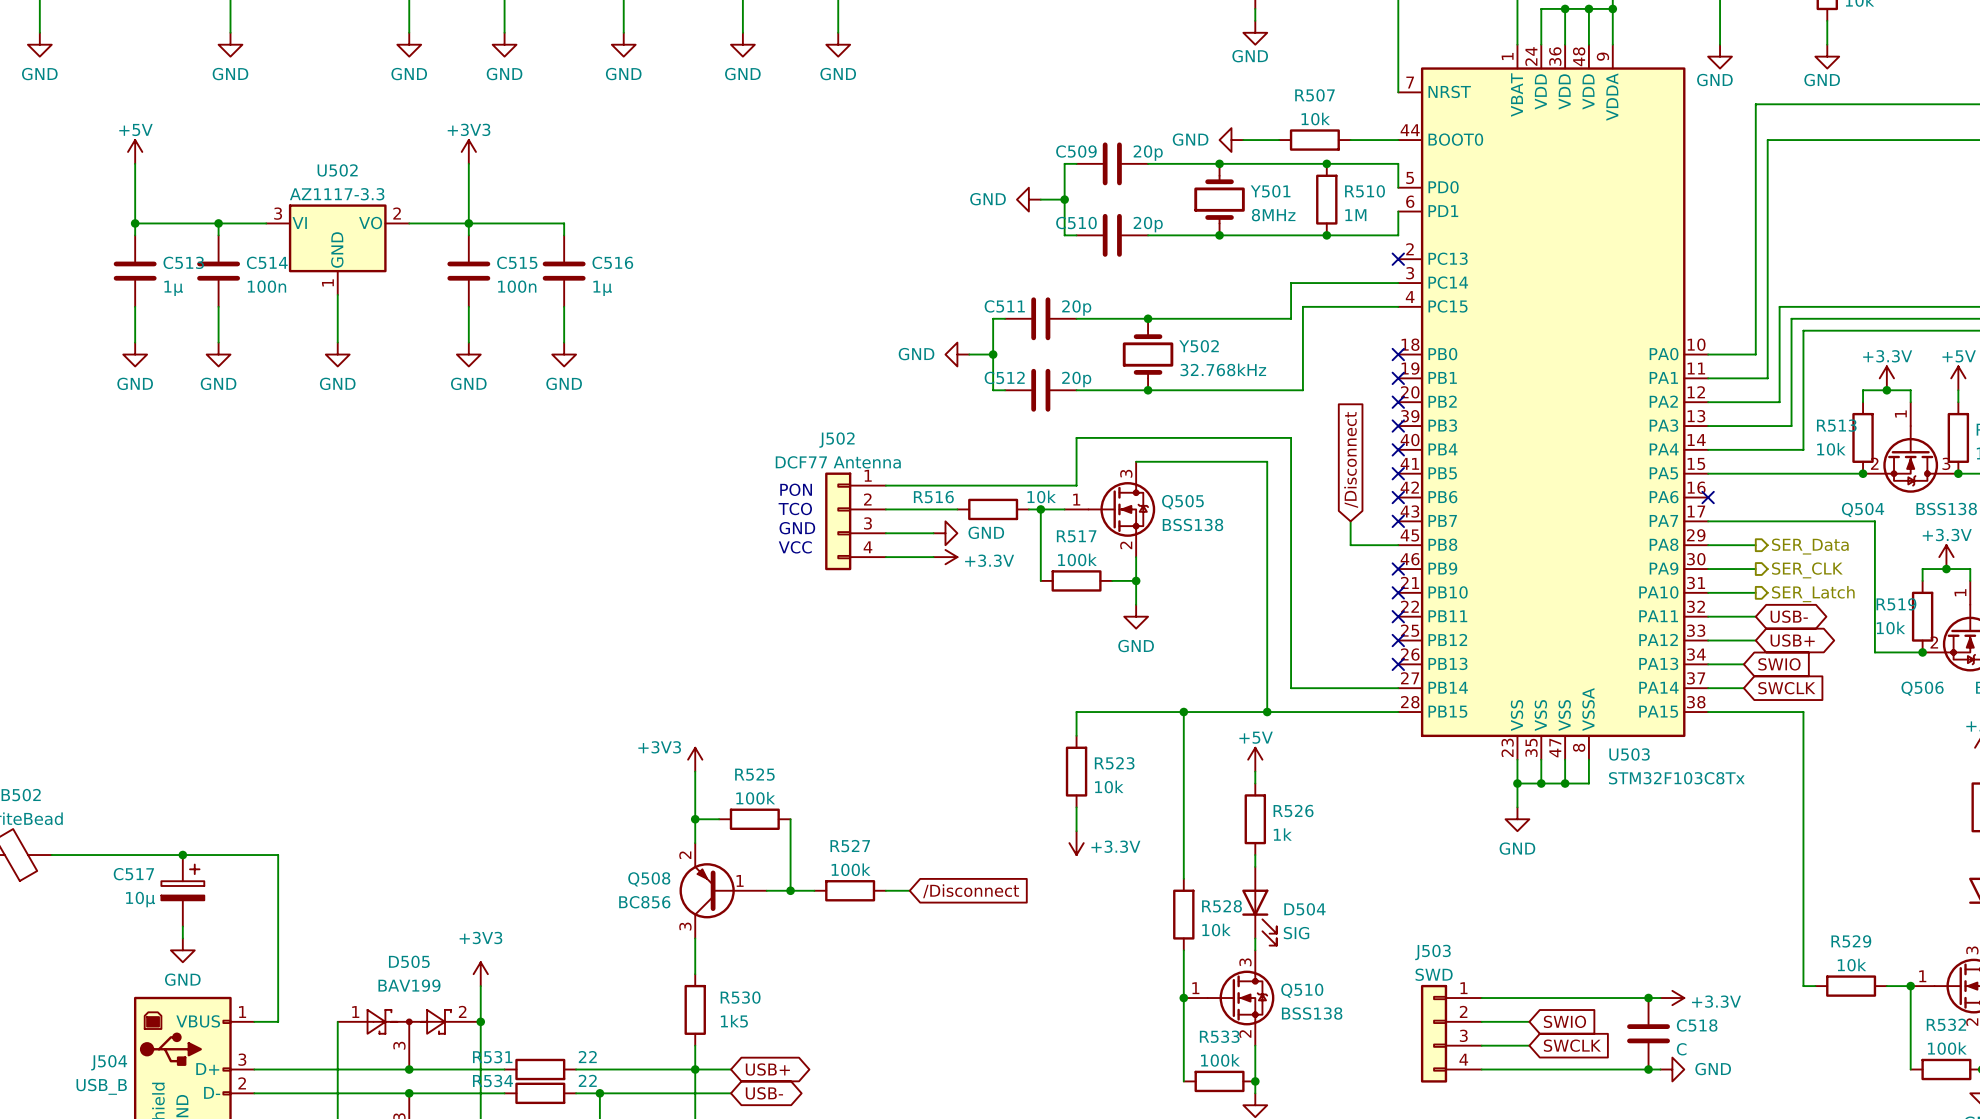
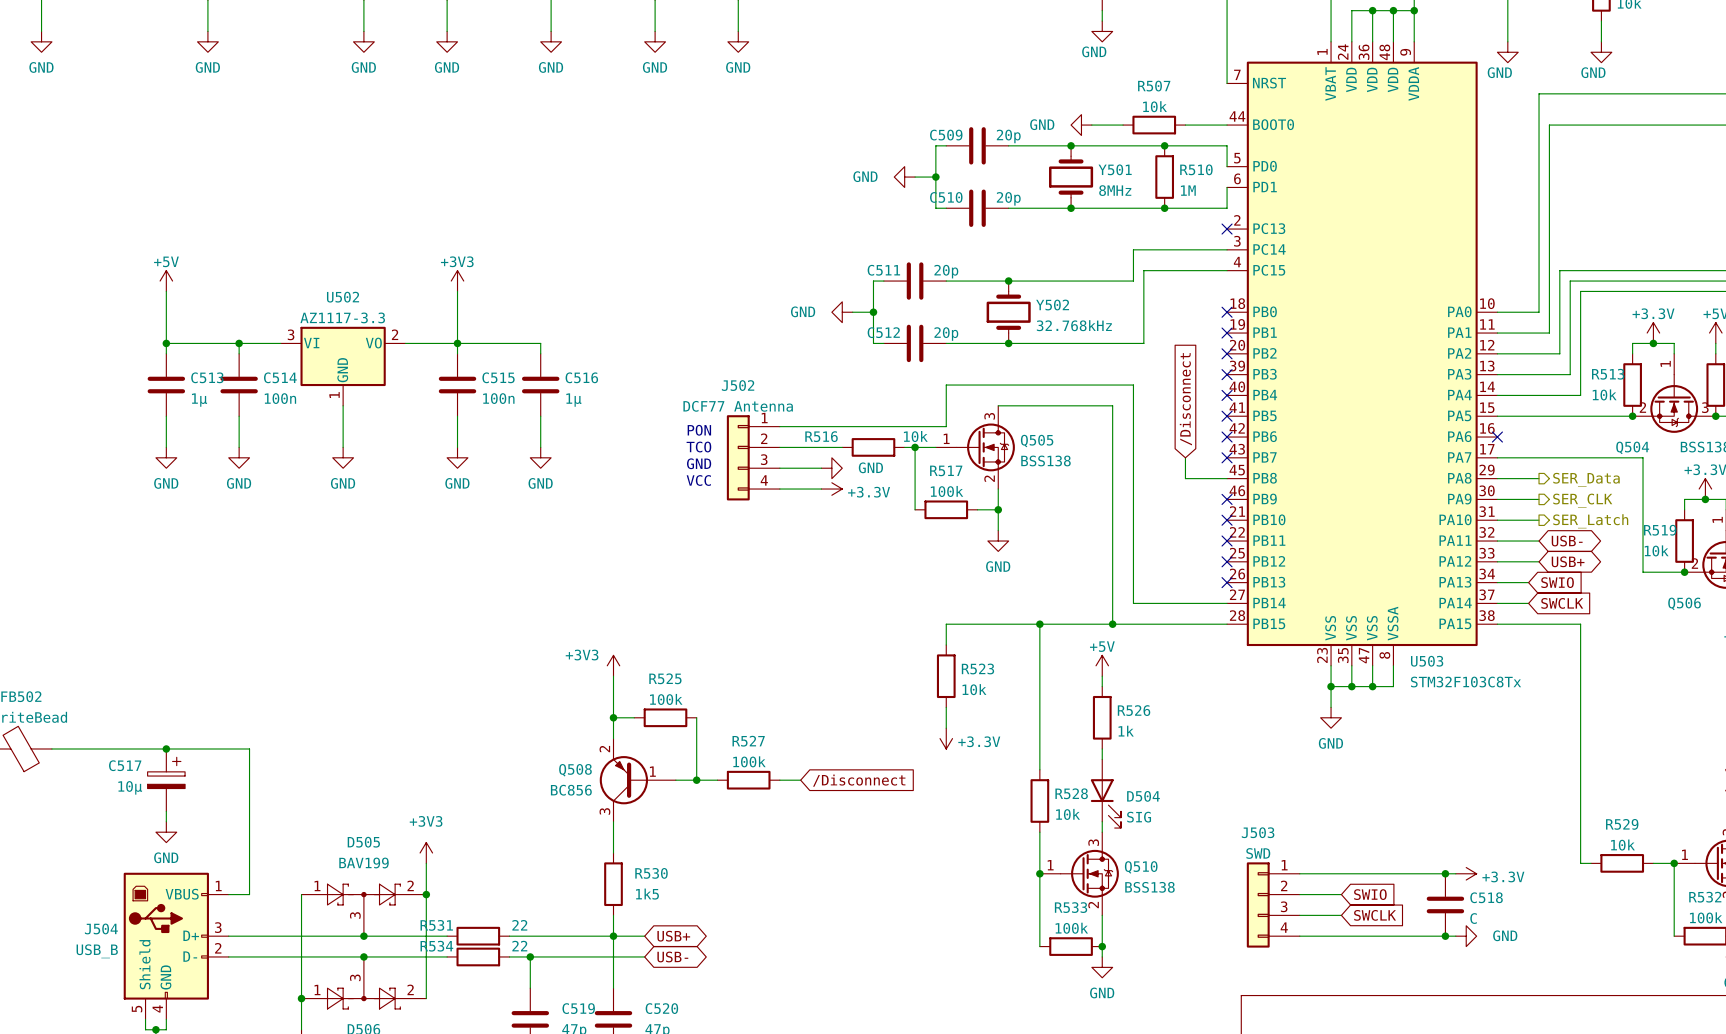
power symbol position: +5V (135, 151) -> +5V (166, 281)
power symbol position: +3V3 (468, 151) -> +3V3 (457, 281)
wire: (135, 163) (135, 235) -> (166, 291) (166, 353)
wire: (468, 163) (468, 235) -> (457, 291) (457, 353)
wire: (135, 223) (266, 223) -> (166, 343) (280, 343)
junction: (135, 223) -> none
wire: (218, 223) (218, 235) -> (239, 343) (239, 353)
junction: (218, 223) -> none
wire: (409, 223) (564, 223) (564, 235) -> (405, 343) (540, 343) (540, 353)
junction: (468, 223) -> none
U502 position: (337, 249) -> (343, 366)
C513 position: (135, 271) -> (166, 385)
C514 position: (218, 271) -> (239, 385)
C515 position: (468, 271) -> (457, 385)
C516 position: (564, 271) -> (540, 385)
wire: (337, 294) (337, 342) -> (343, 405) (343, 447)
wire: (135, 306) (135, 342) -> (166, 416) (166, 447)
wire: (218, 306) (218, 342) -> (239, 416) (239, 447)
wire: (468, 306) (468, 342) -> (457, 416) (457, 447)
wire: (564, 306) (564, 342) -> (540, 416) (540, 447)
power symbol: GND (135, 354) -> none
power symbol: GND (218, 354) -> none
power symbol: GND (337, 354) -> none
power symbol: GND (468, 354) -> none
power symbol: GND (564, 354) -> none
junction: none -> (166, 343)
junction: none -> (239, 343)
junction: none -> (457, 343)
power symbol: none -> GND (166, 457)
power symbol: none -> GND (239, 457)
power symbol: none -> GND (343, 457)
power symbol: none -> GND (457, 457)
power symbol: none -> GND (540, 457)

